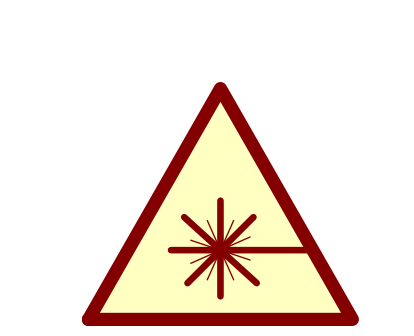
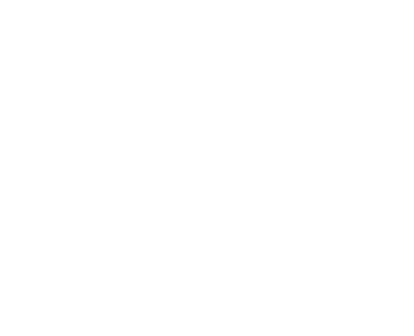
power symbol: (220, 203) -> none

